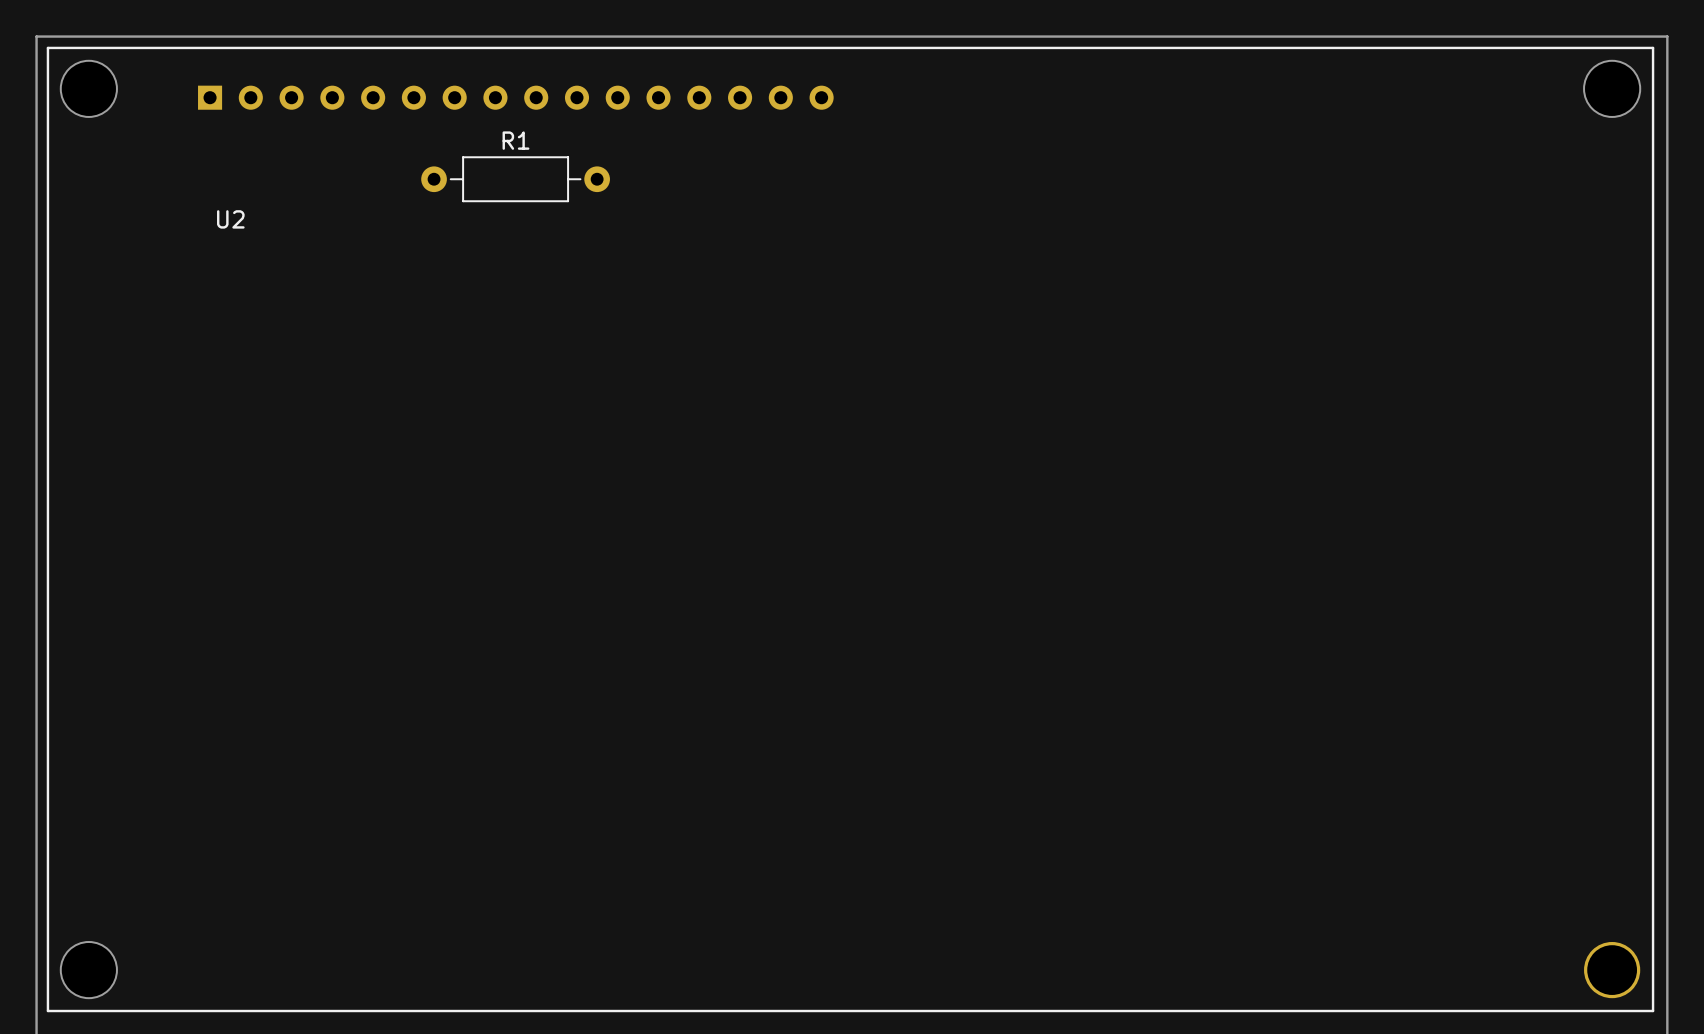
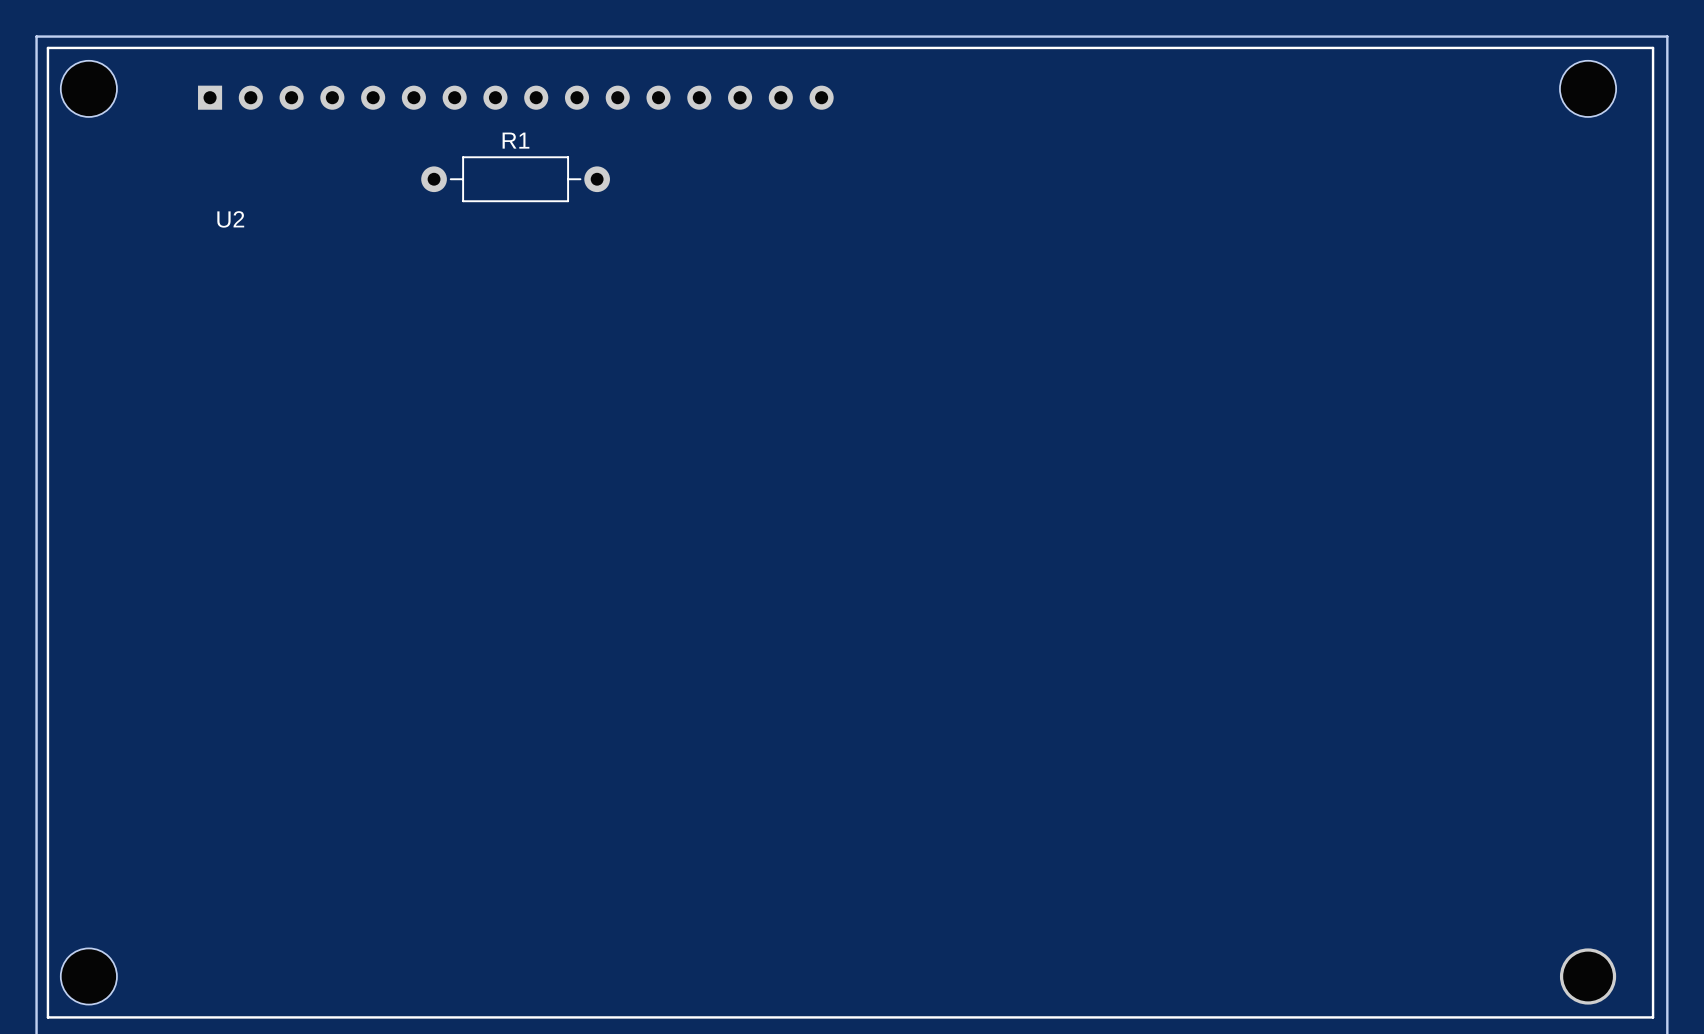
U2 footprint: [46, 46, 1655, 1013] -> [46, 46, 1655, 1019]

